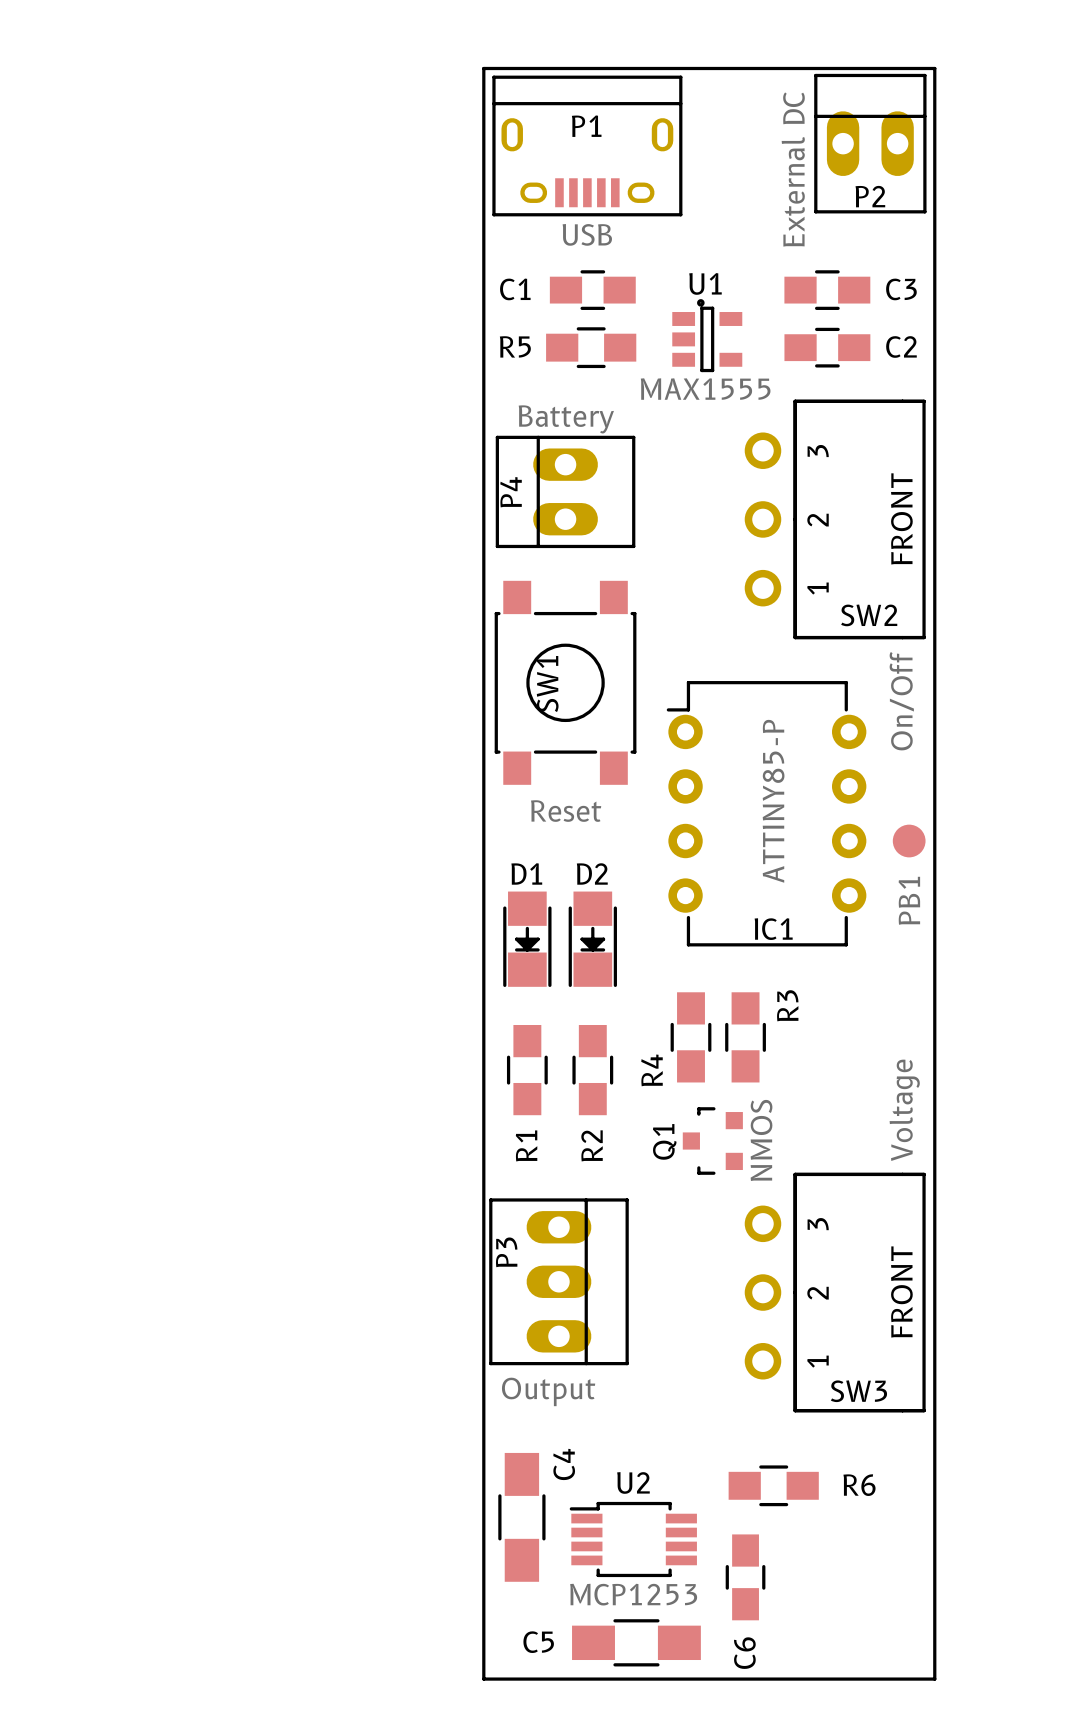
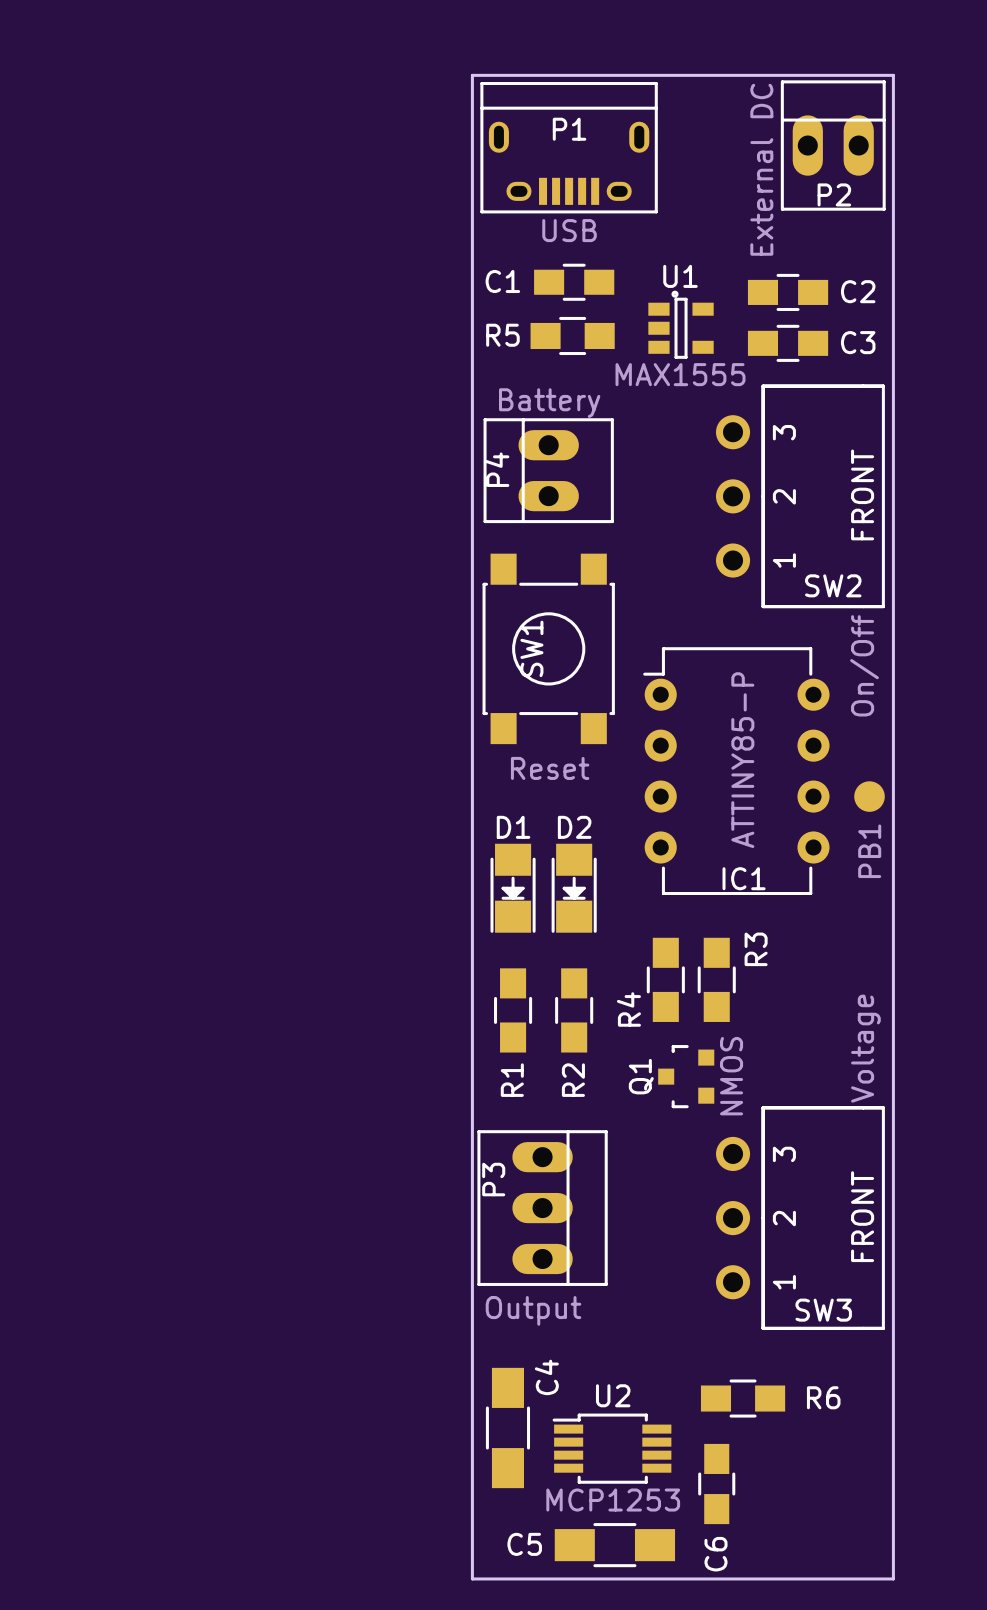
C3 position: (827, 290) -> (788, 343)
C2 position: (827, 347) -> (788, 292)

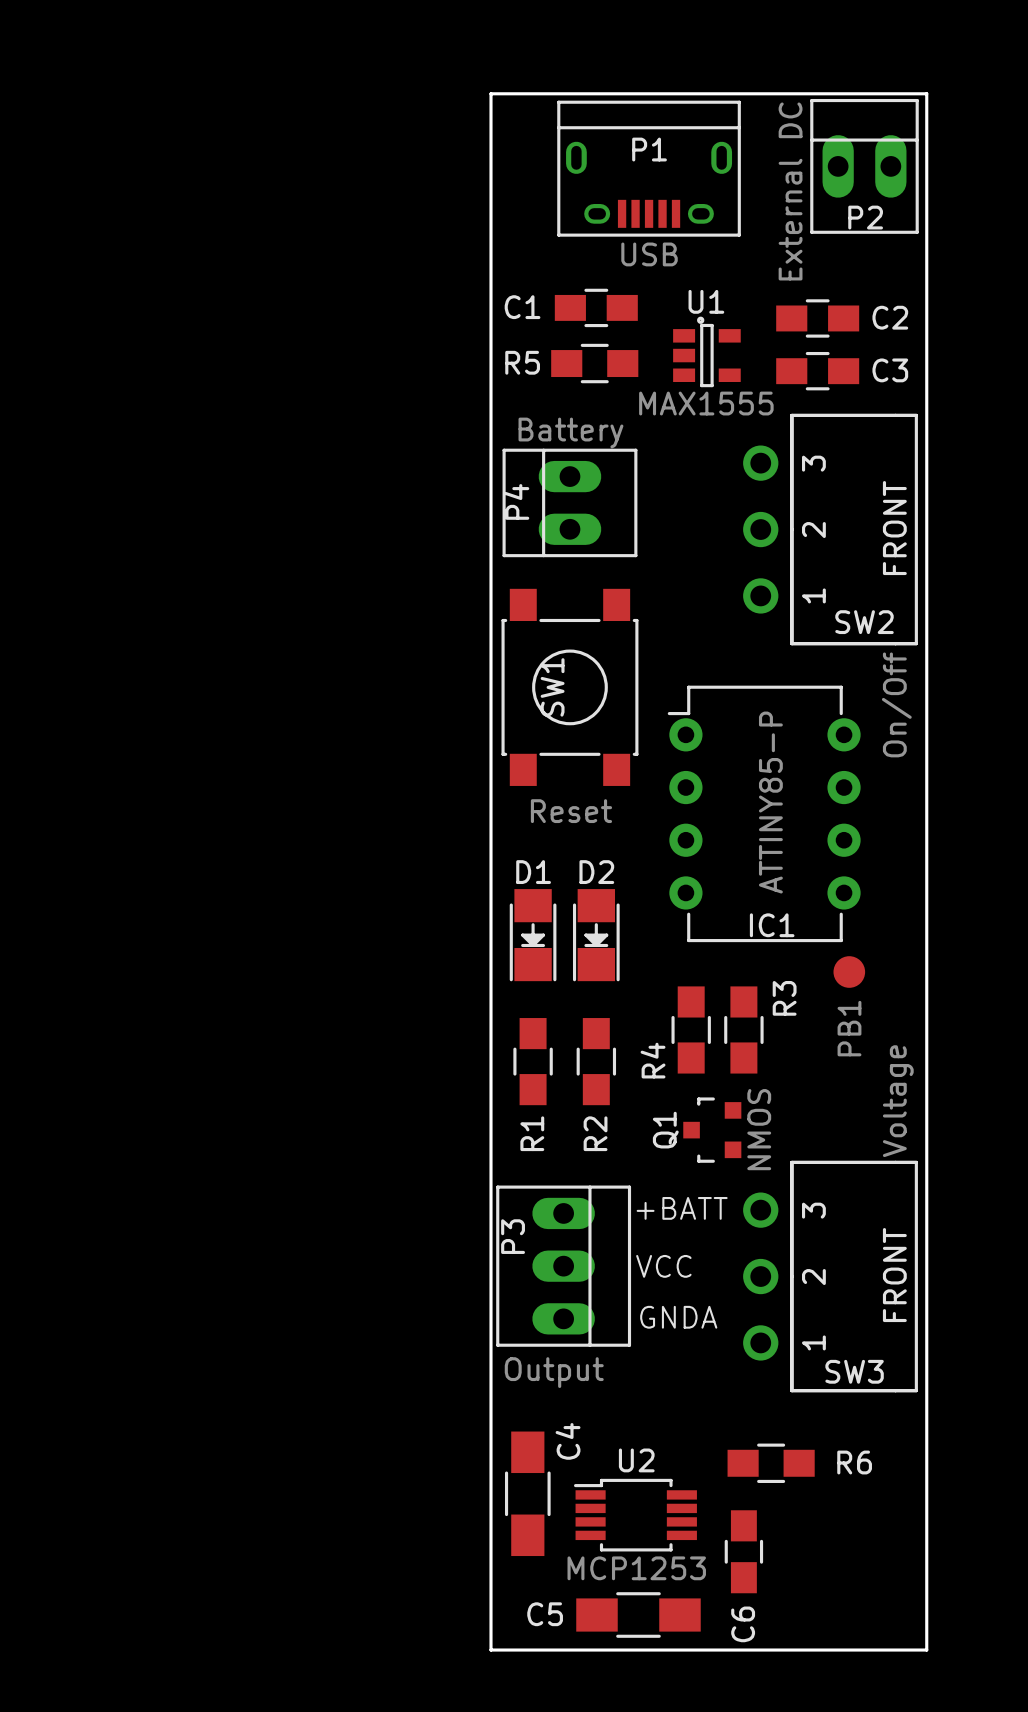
P1 position: (569, 147) -> (649, 168)
part position: (869, 796) -> (849, 972)
text: none -> +BATT (682, 1208)
text: none -> VCC (663, 1266)
text: none -> GNDA (678, 1317)

